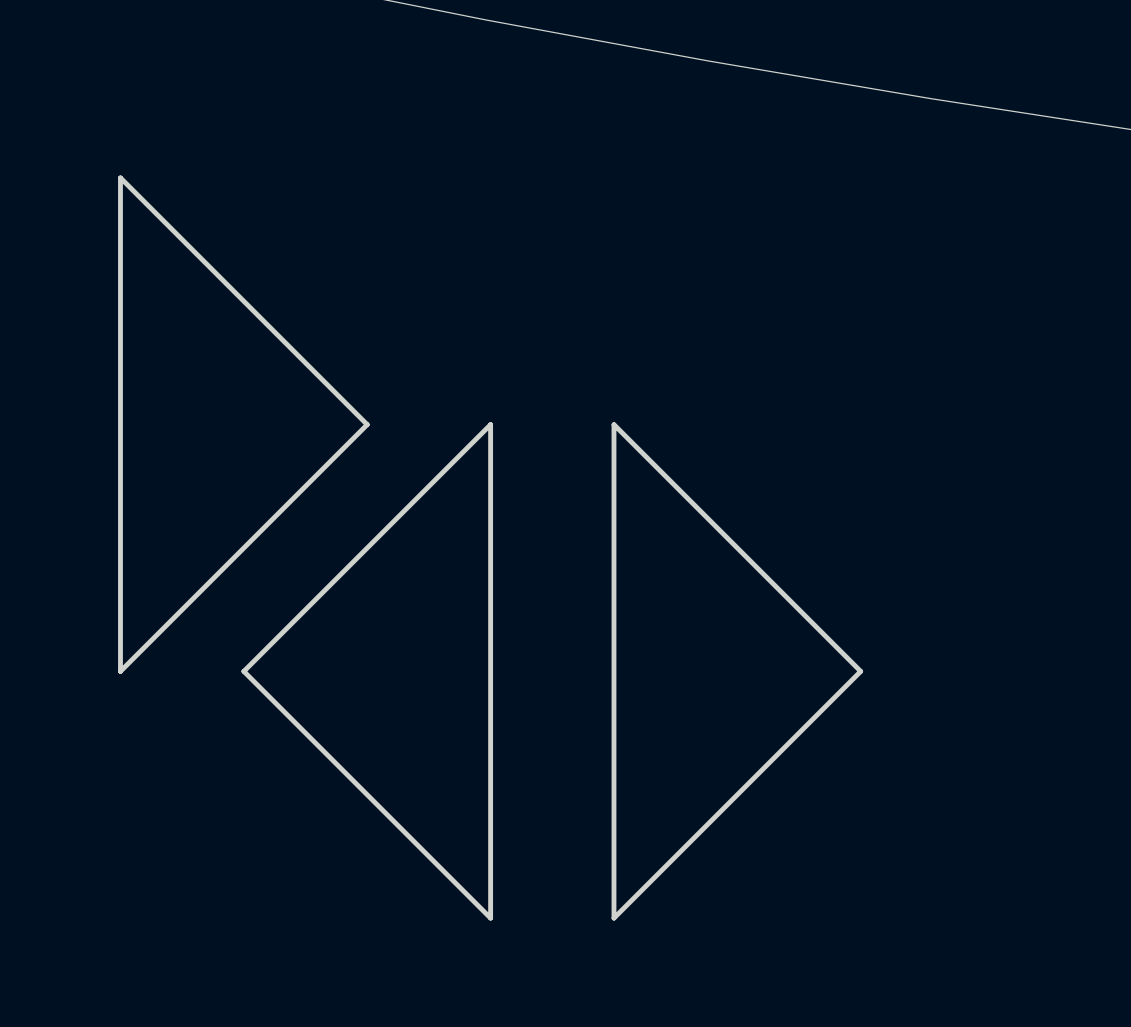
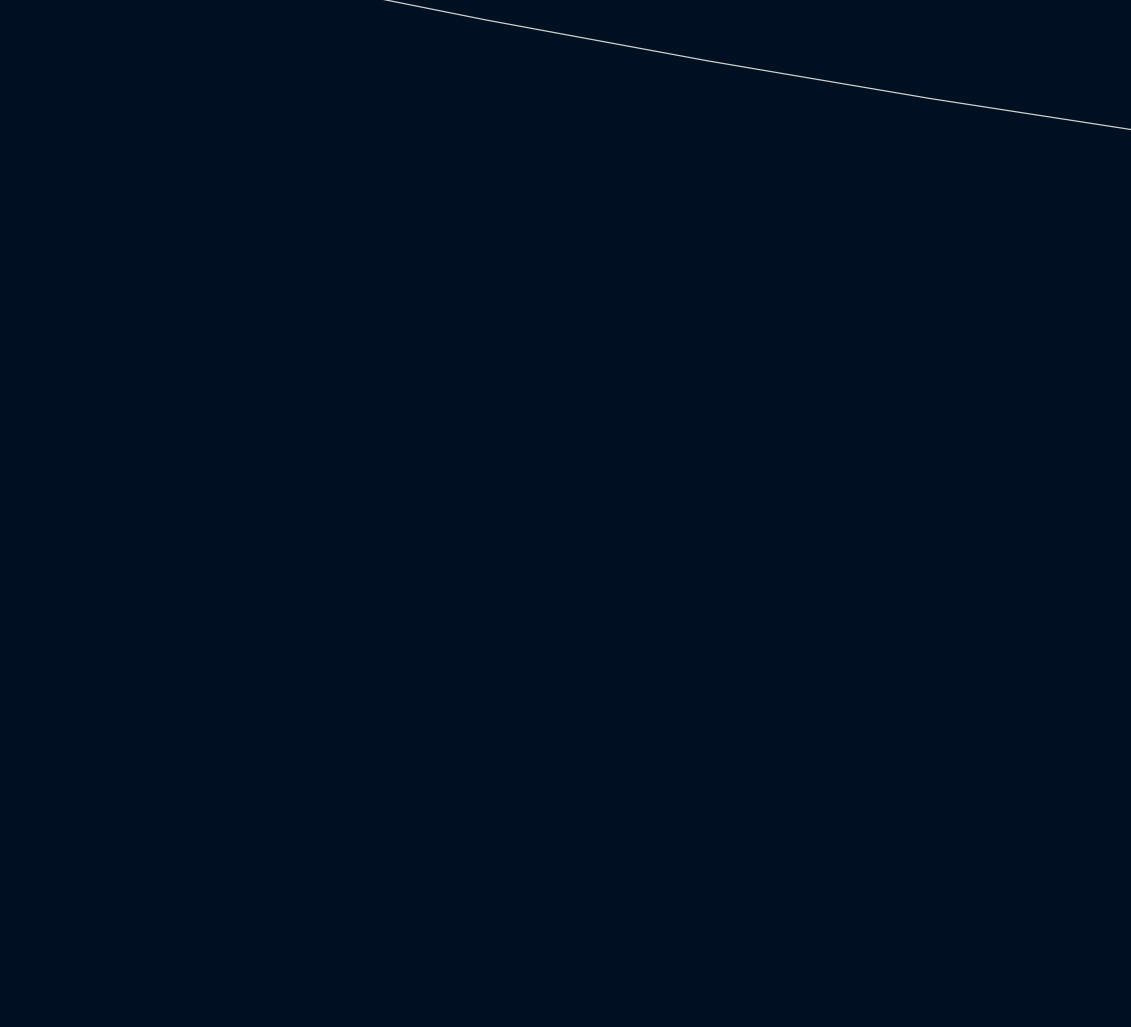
board edge: (120, 177) (120, 671) (367, 424) (120, 177) -> none
board edge: (490, 424) (243, 671) (490, 918) (490, 424) -> none
board edge: (613, 424) (613, 918) (860, 671) (613, 424) -> none

